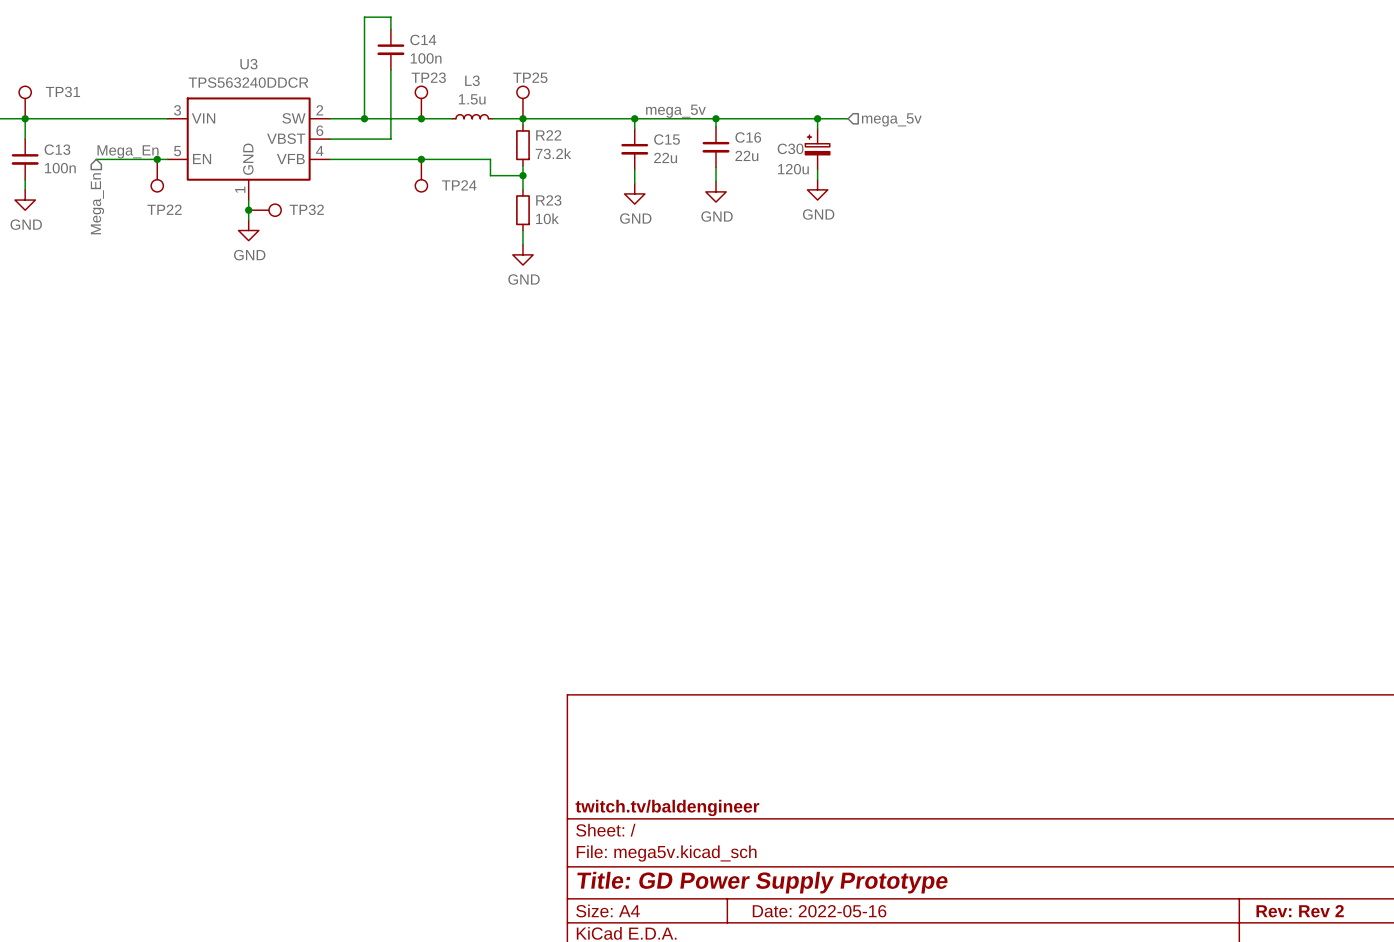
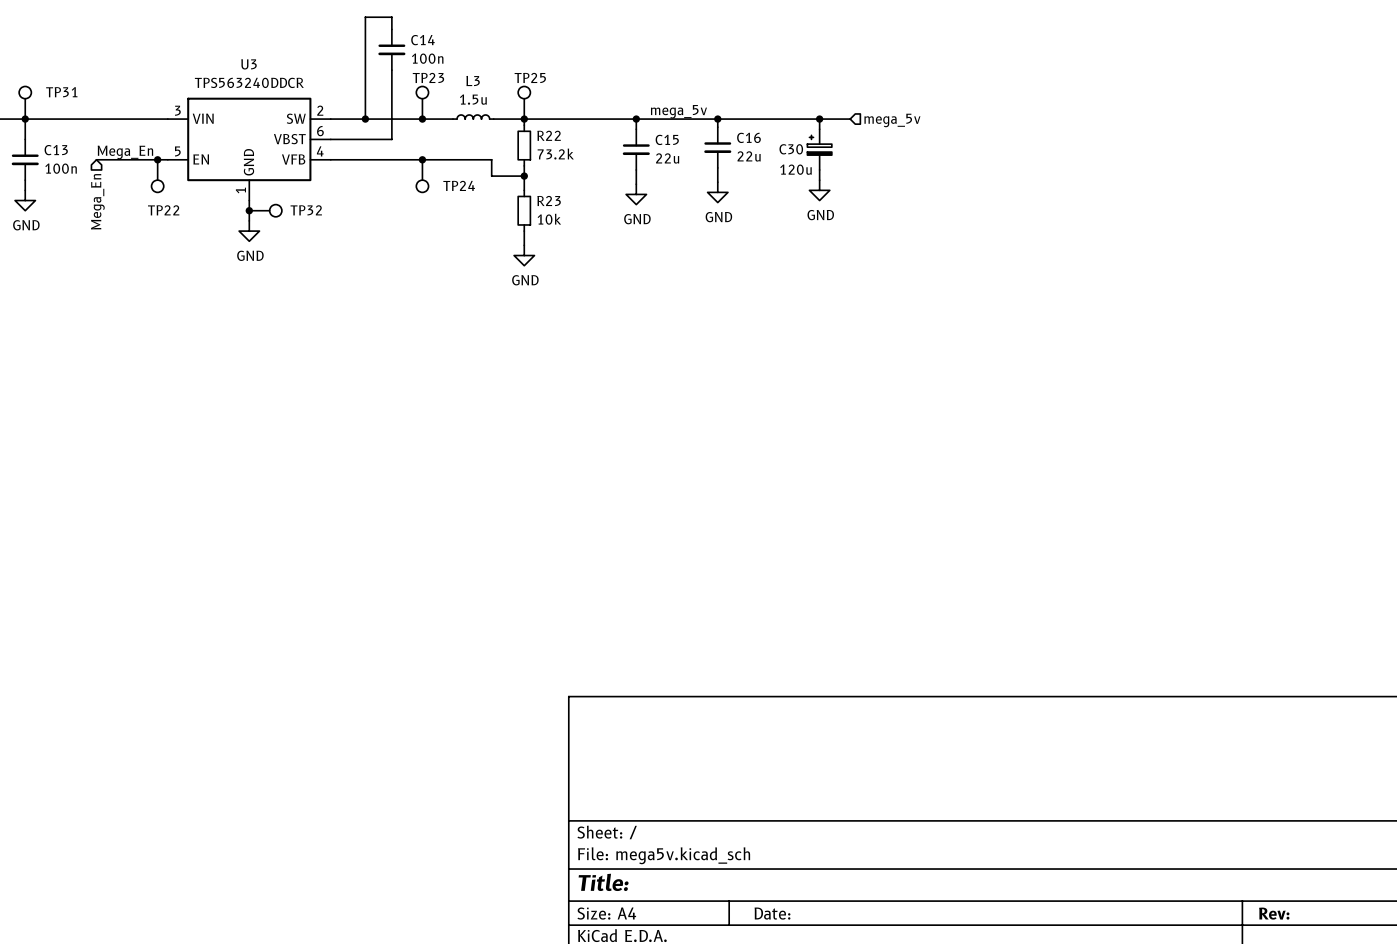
title block: twitch.tv/baldengineer (667, 807) -> none
title block: Title: GD Power Supply Prototype (762, 882) -> Title: (603, 882)
title block: Date: 2022-05-16 (819, 911) -> Date: (772, 913)
title block: Rev: Rev 2 (1300, 911) -> Rev: (1274, 913)

